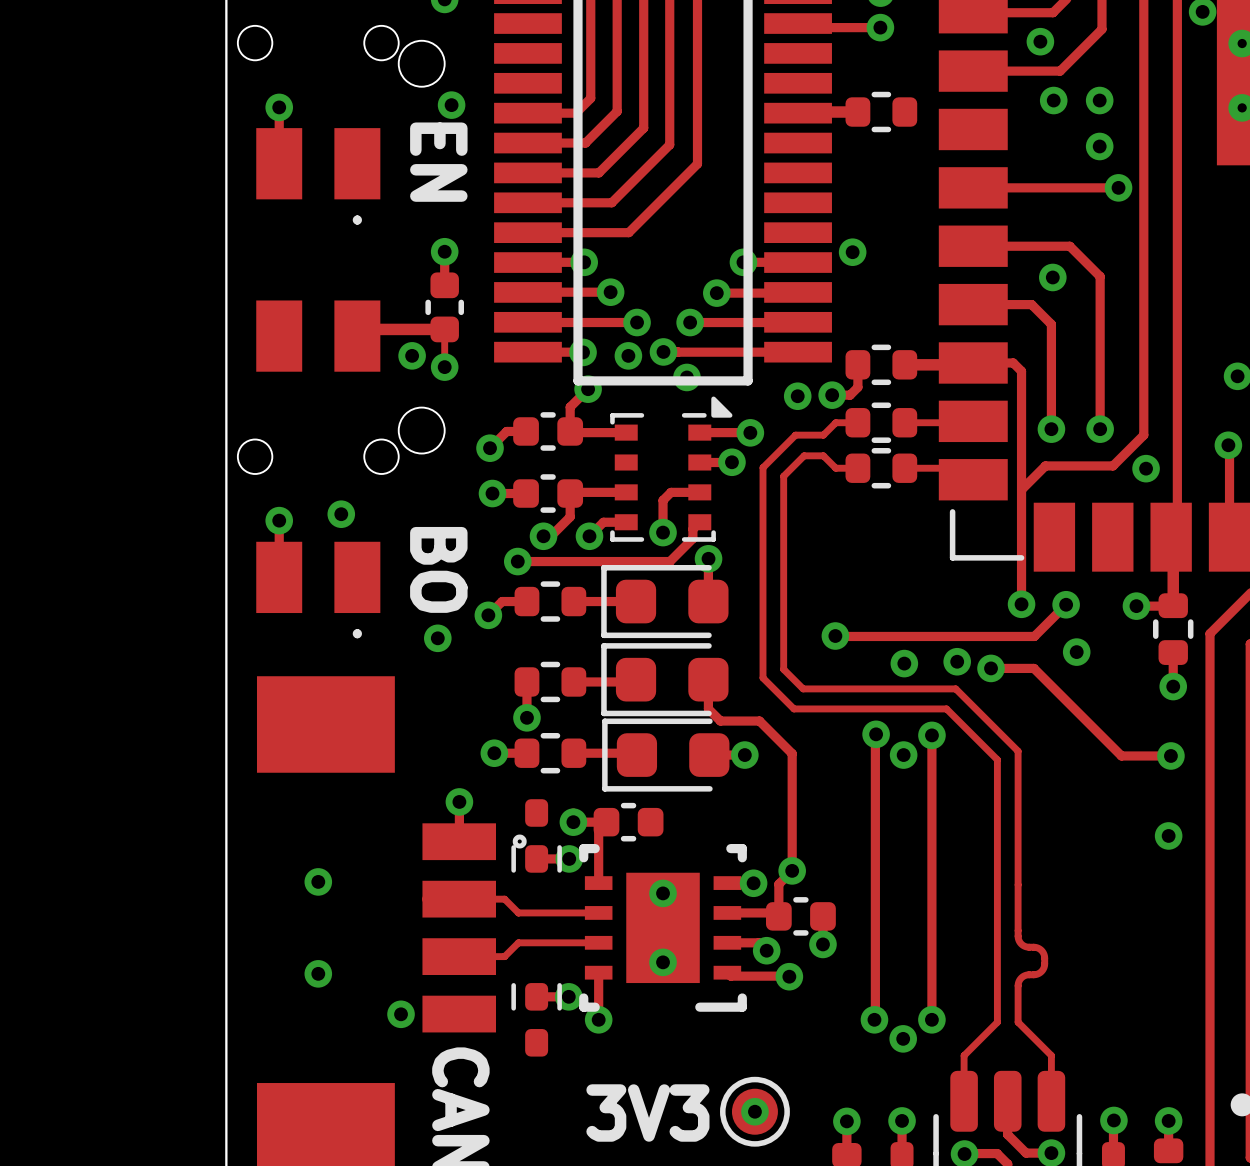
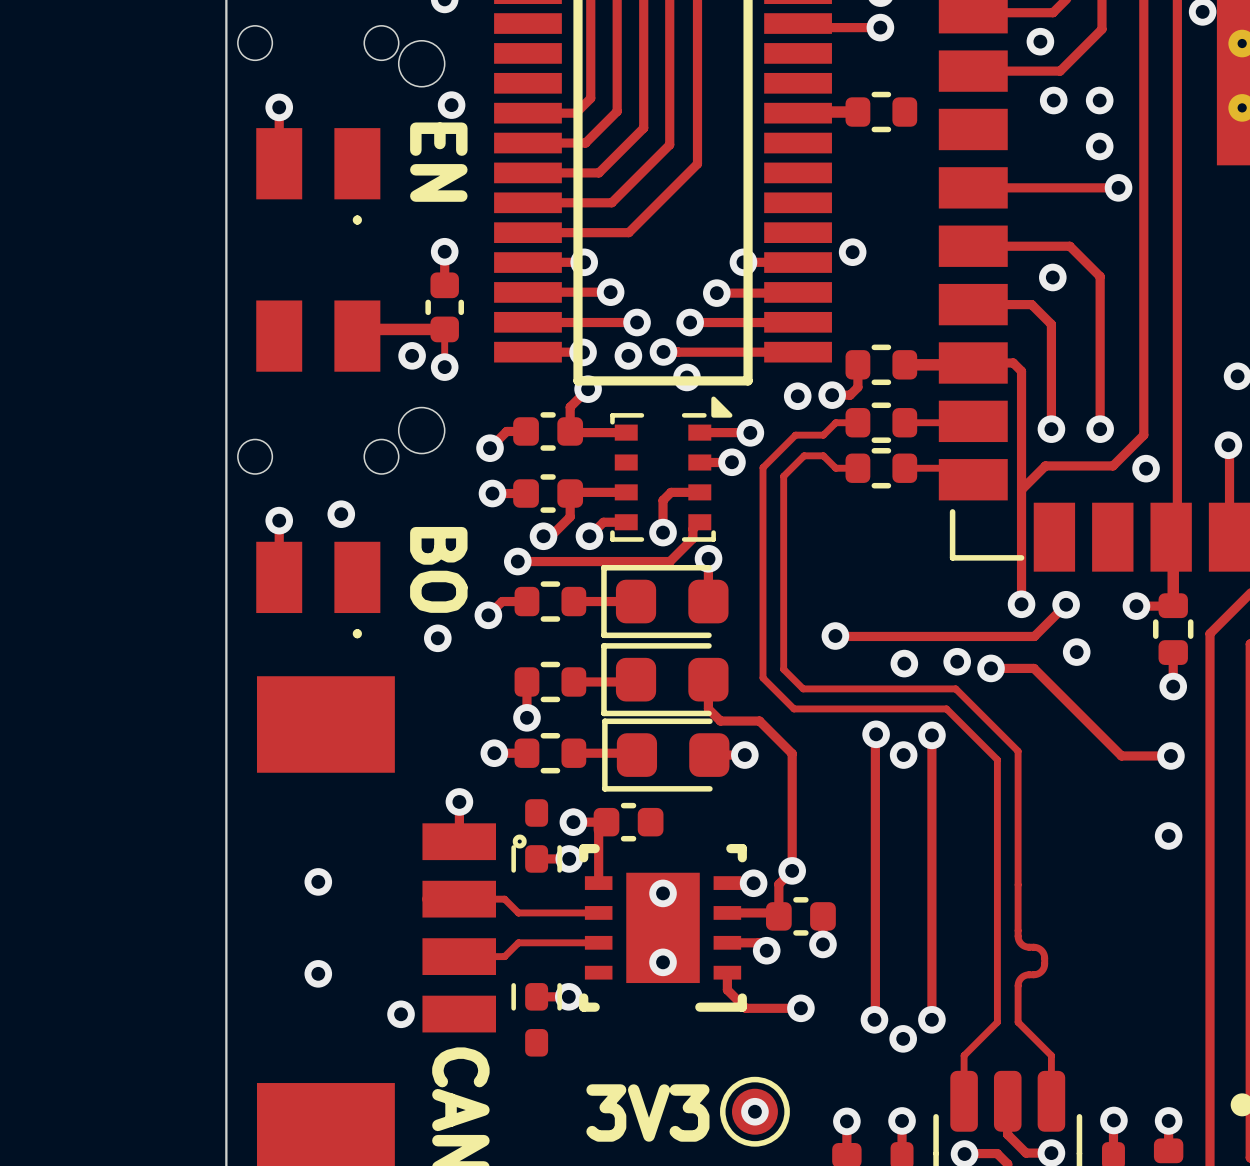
track: (598, 972) (598, 1019) -> none
track: (727, 972) (730, 976) (788, 976) -> (727, 972) (727, 989) (745, 1008) (800, 1008)
via position: (789, 976) -> (800, 1008)
via: (598, 1019) -> none

